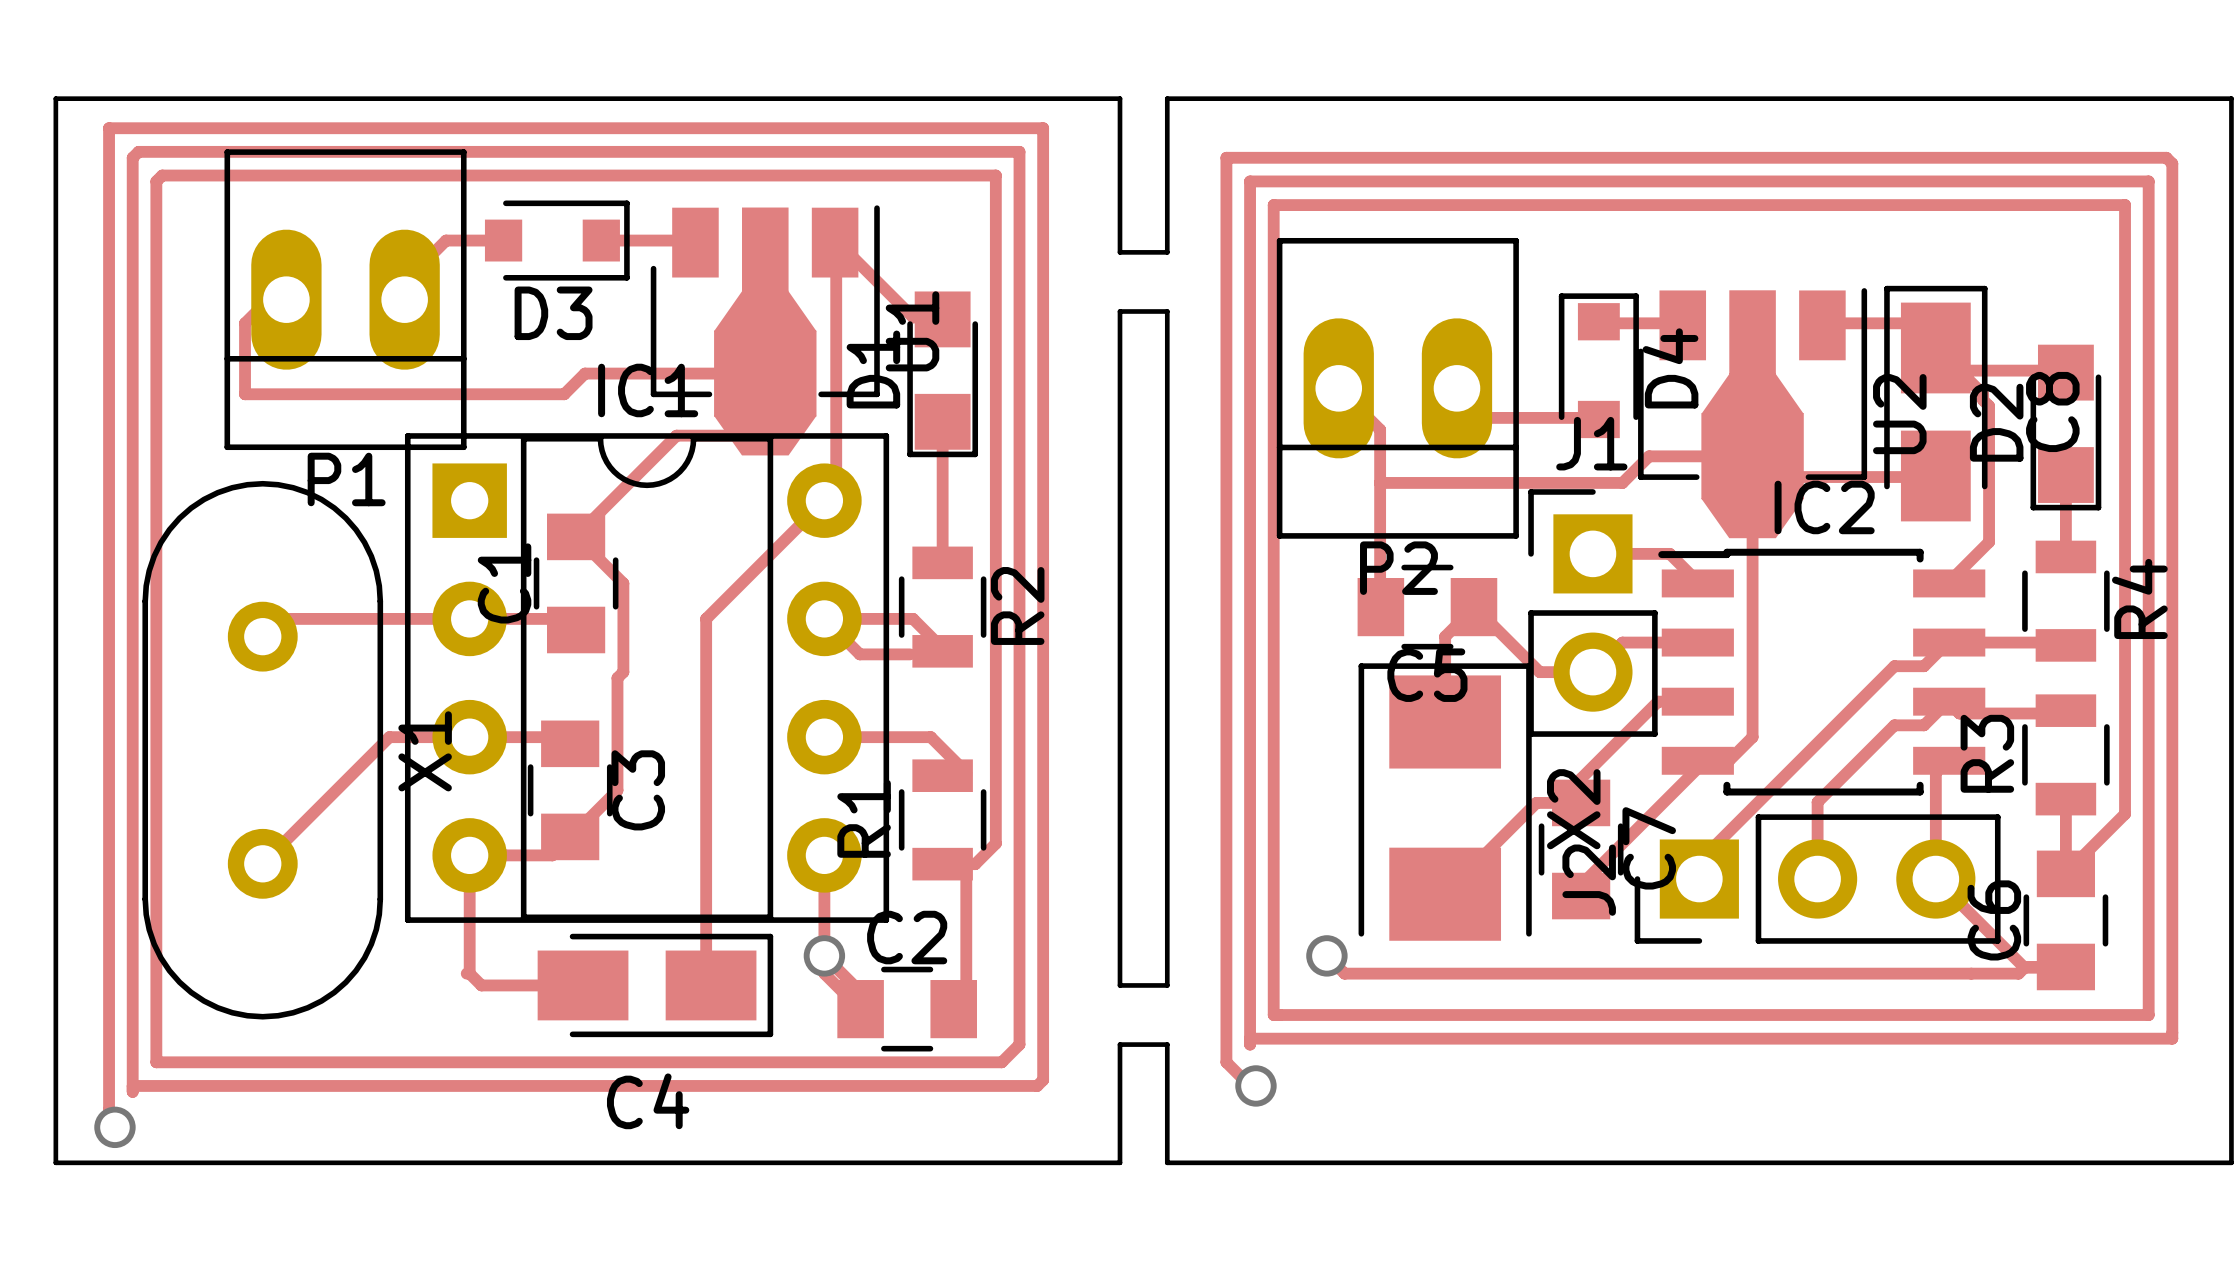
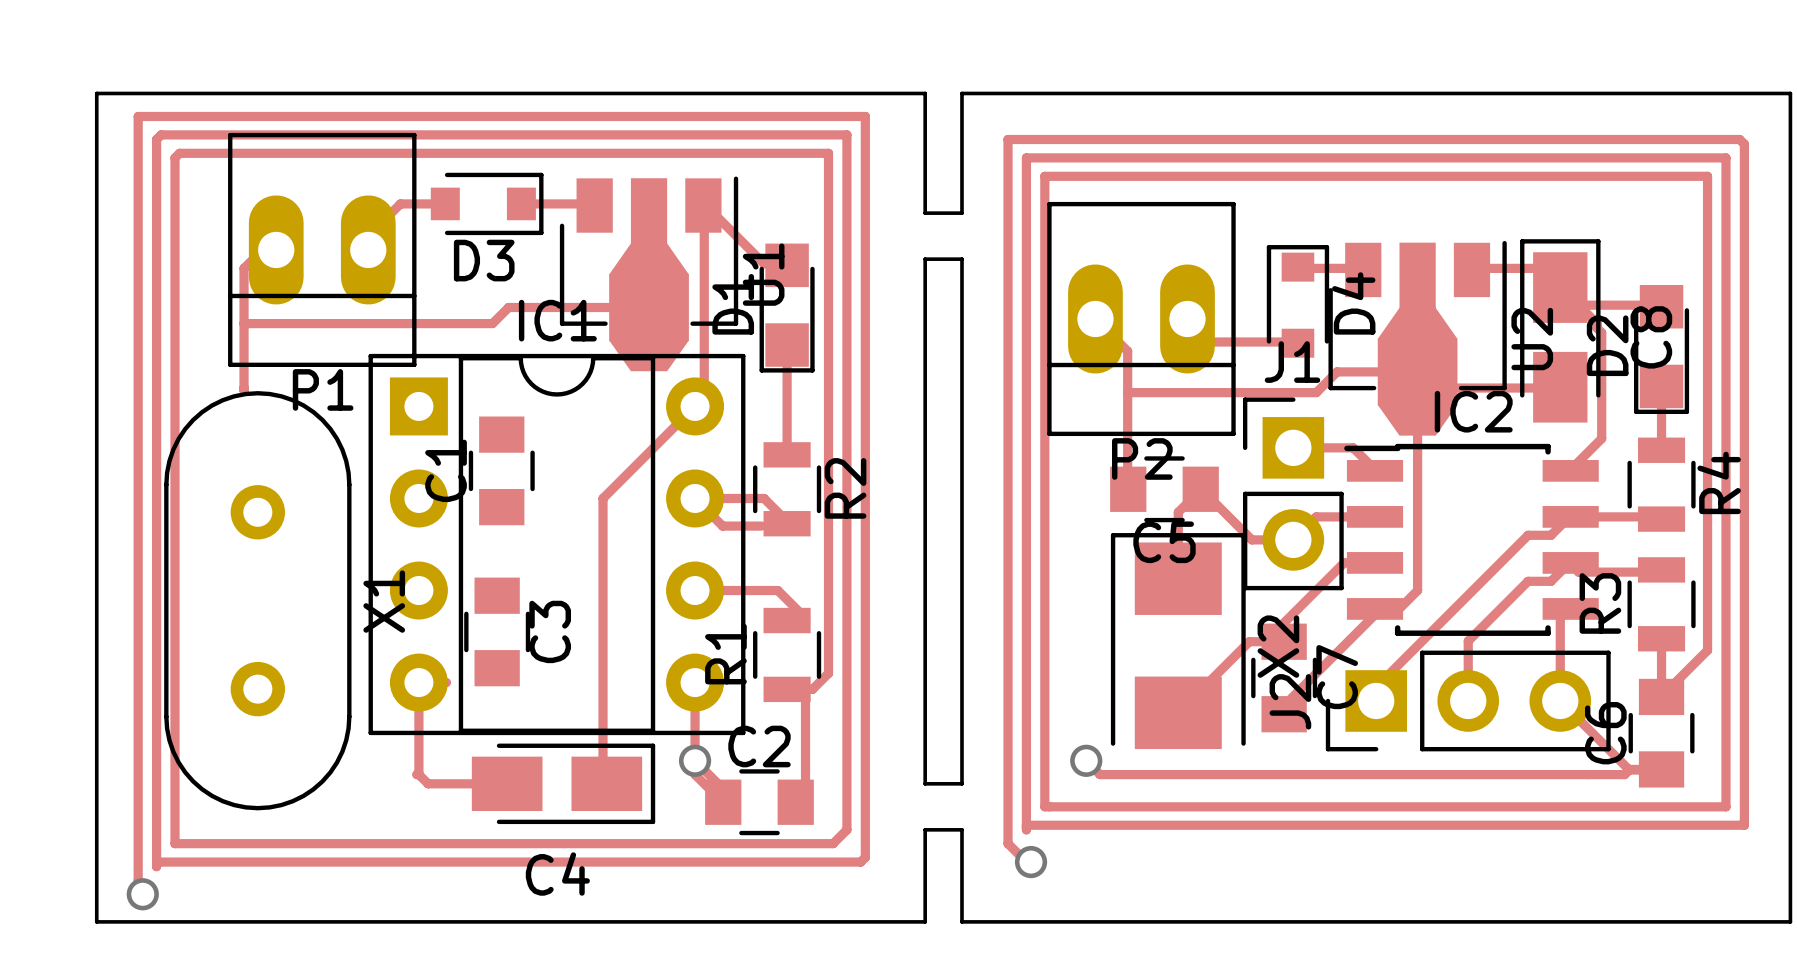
track: none -> (244, 323) (244, 390)
track: (765, 435) (676, 435) (576, 536) (623, 583) (623, 672) (617, 678) (617, 790) (552, 855) (505, 855) -> none
track: (576, 630) (564, 618) (280, 618) (262, 636) -> none
track: (570, 743) (564, 737) (389, 737) (262, 863) -> none

